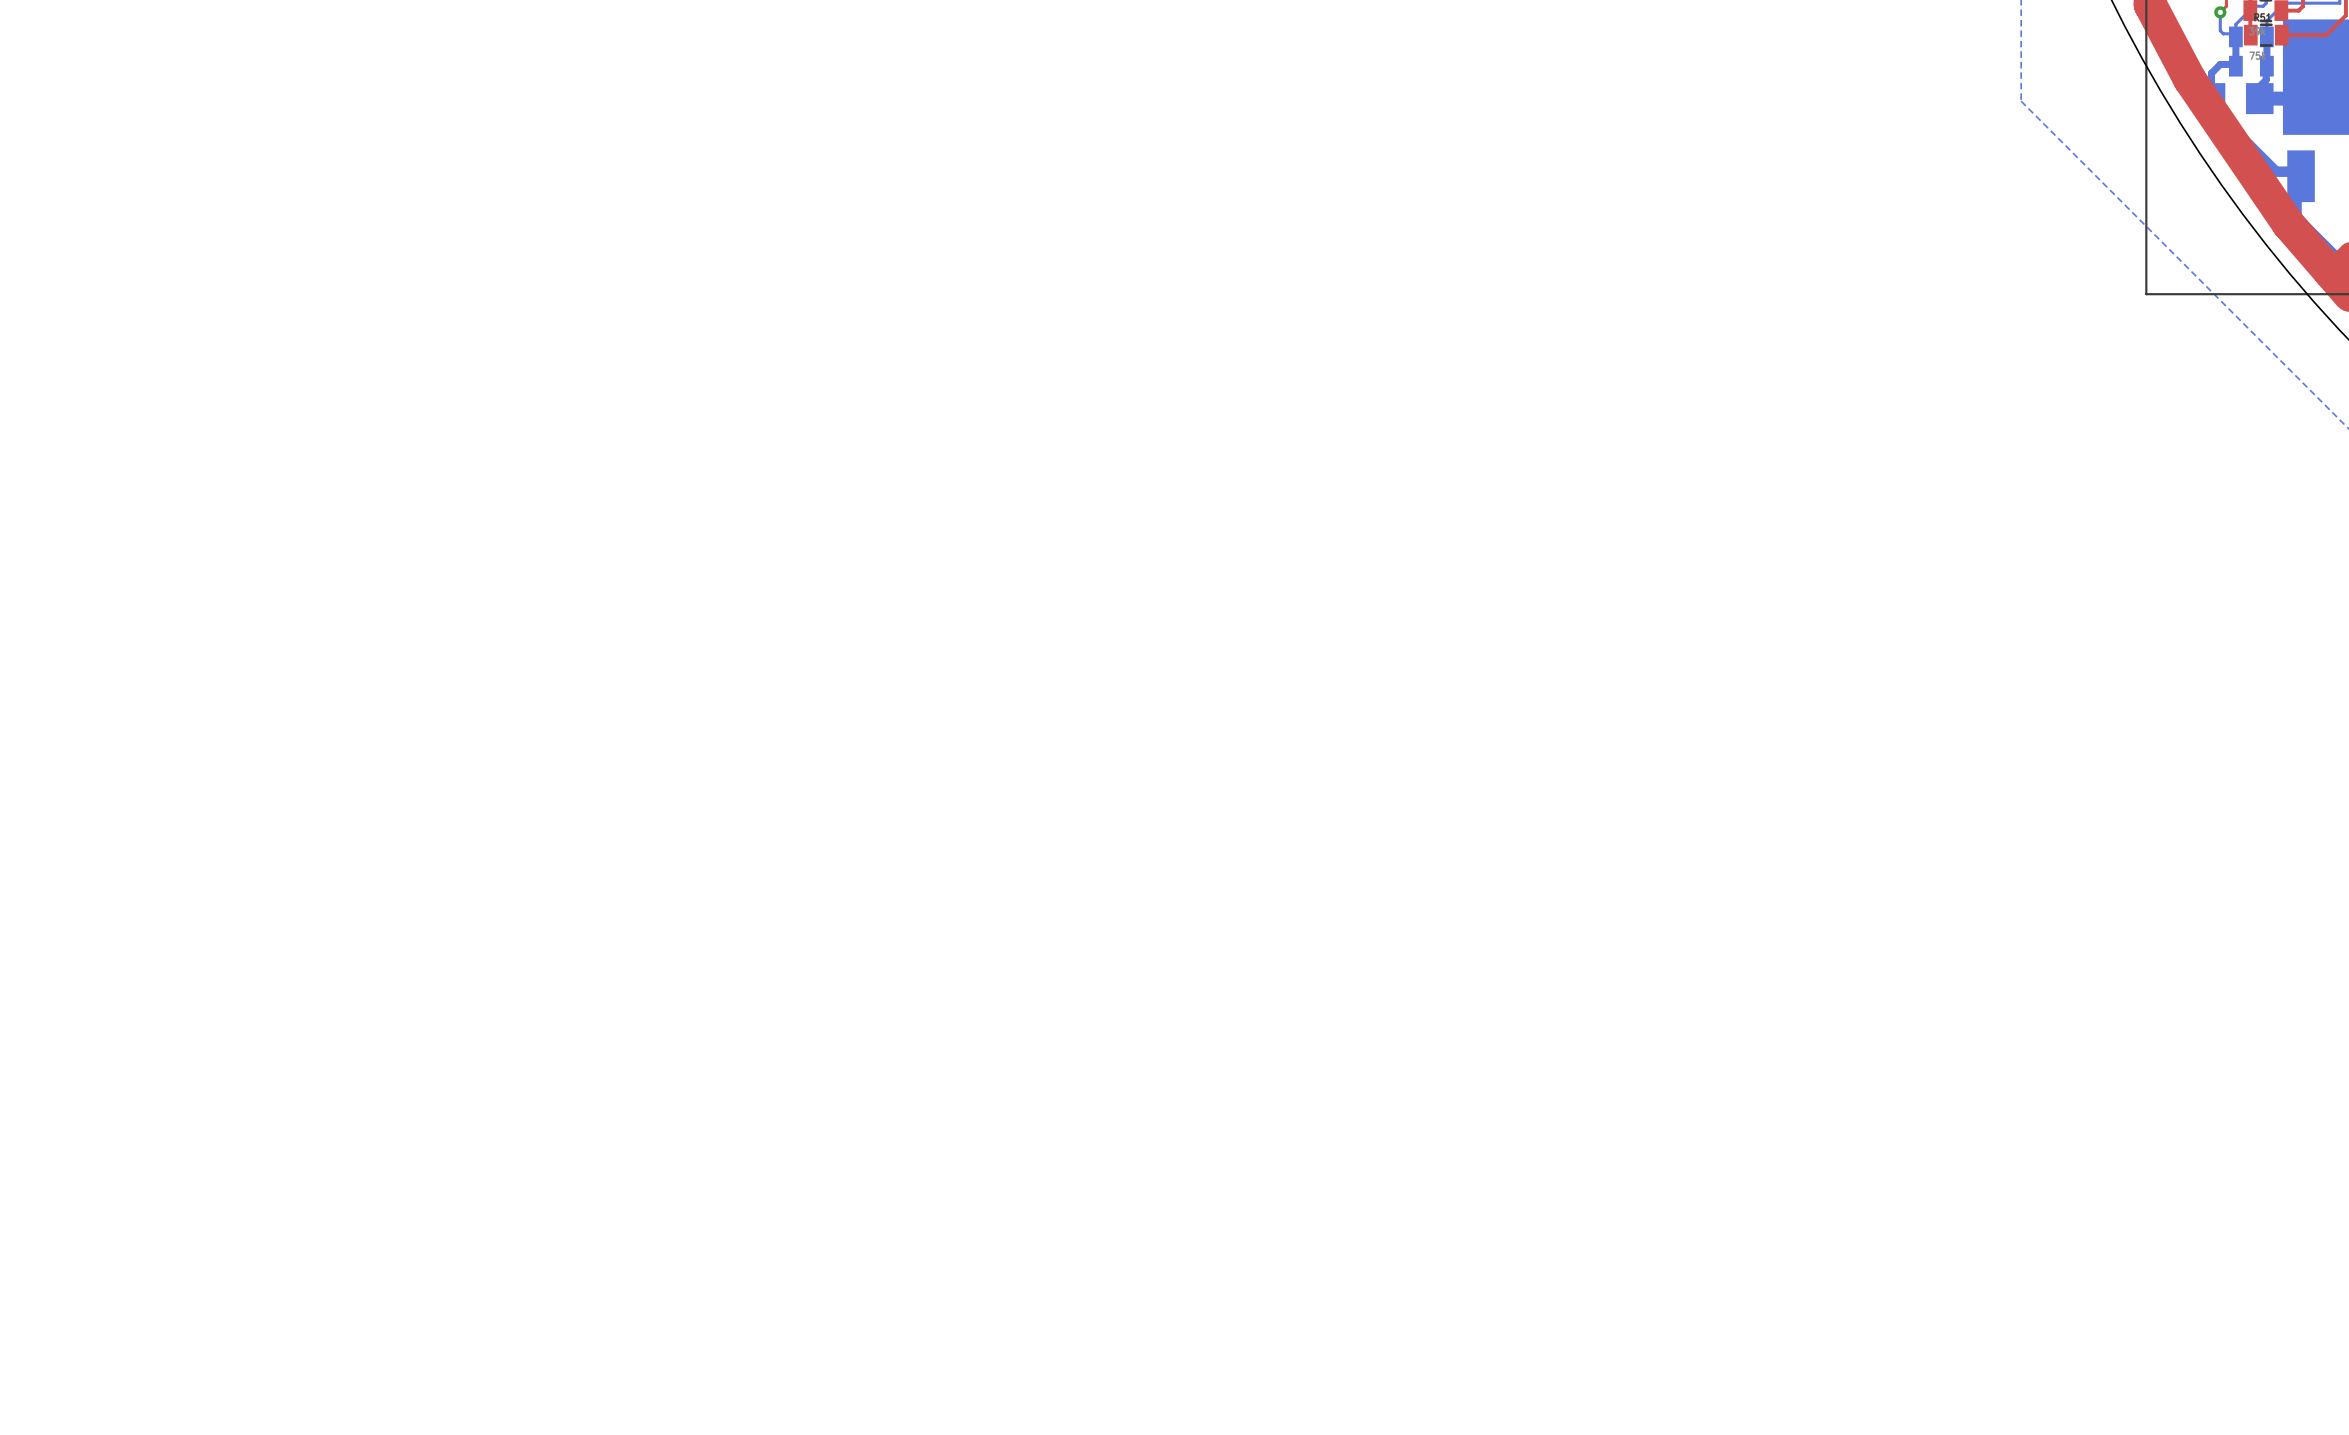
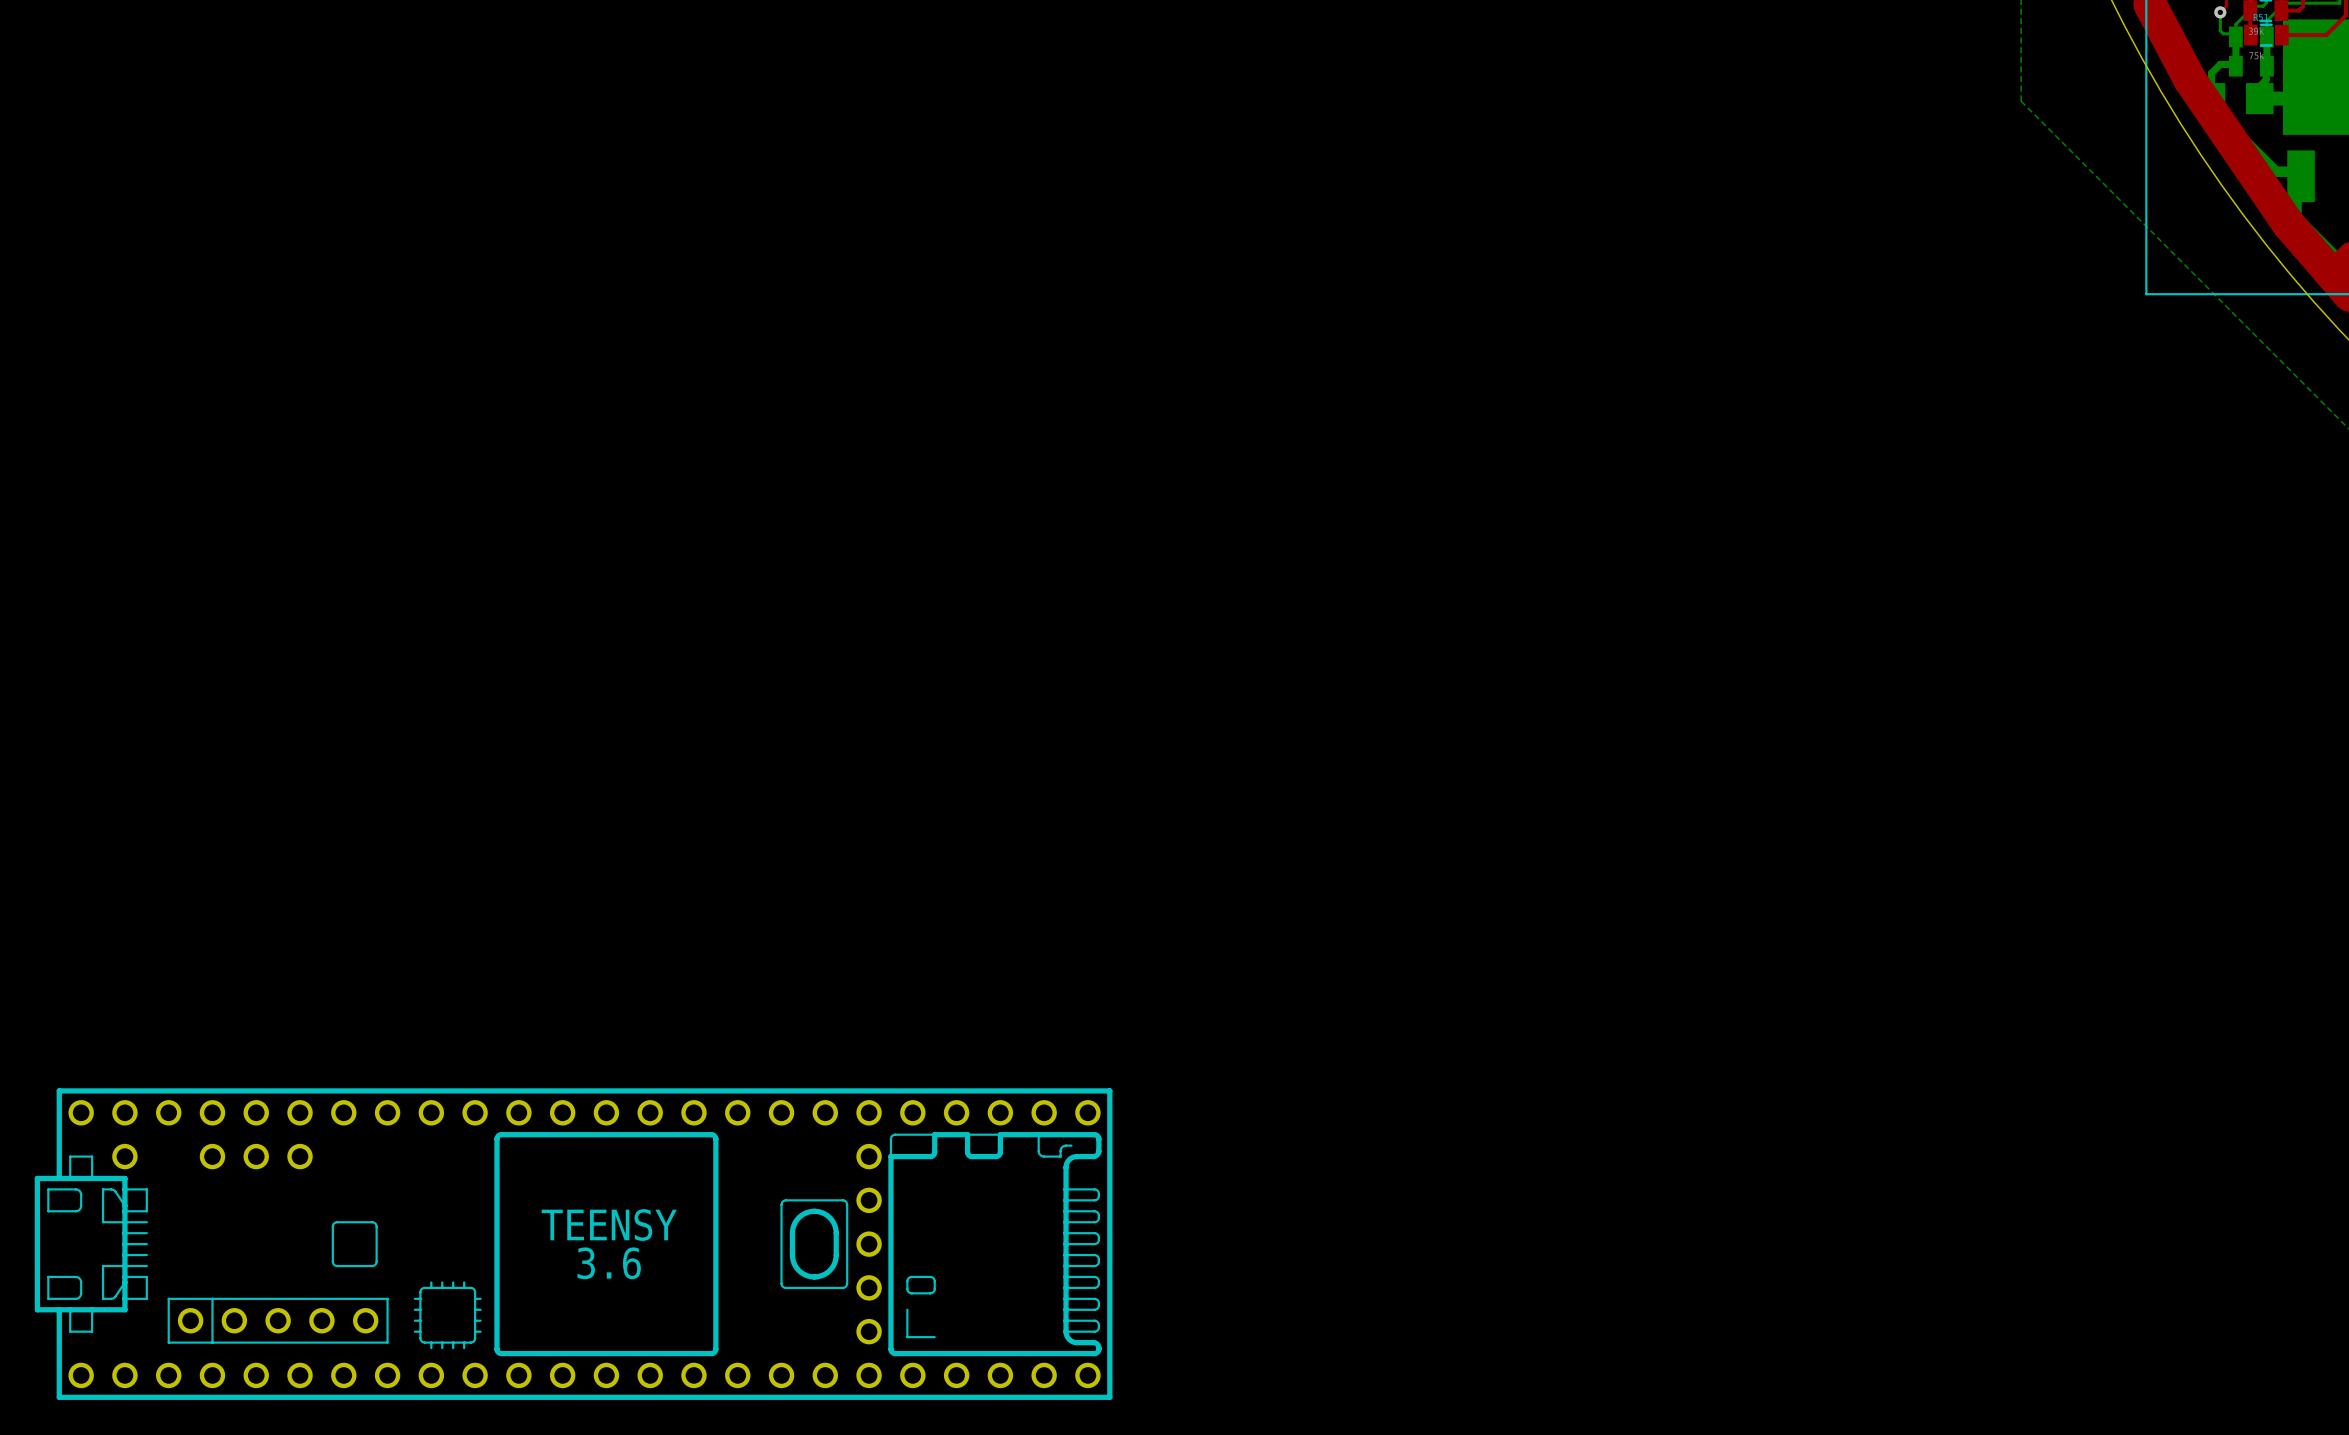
part: none -> (573, 1244)

